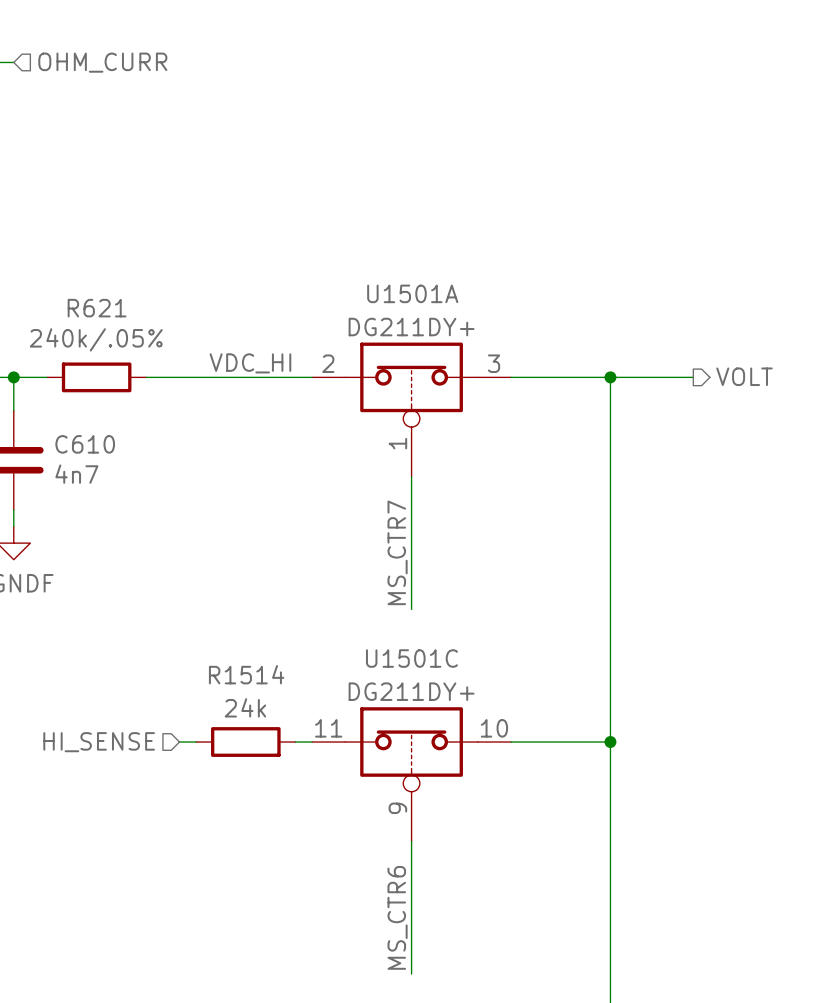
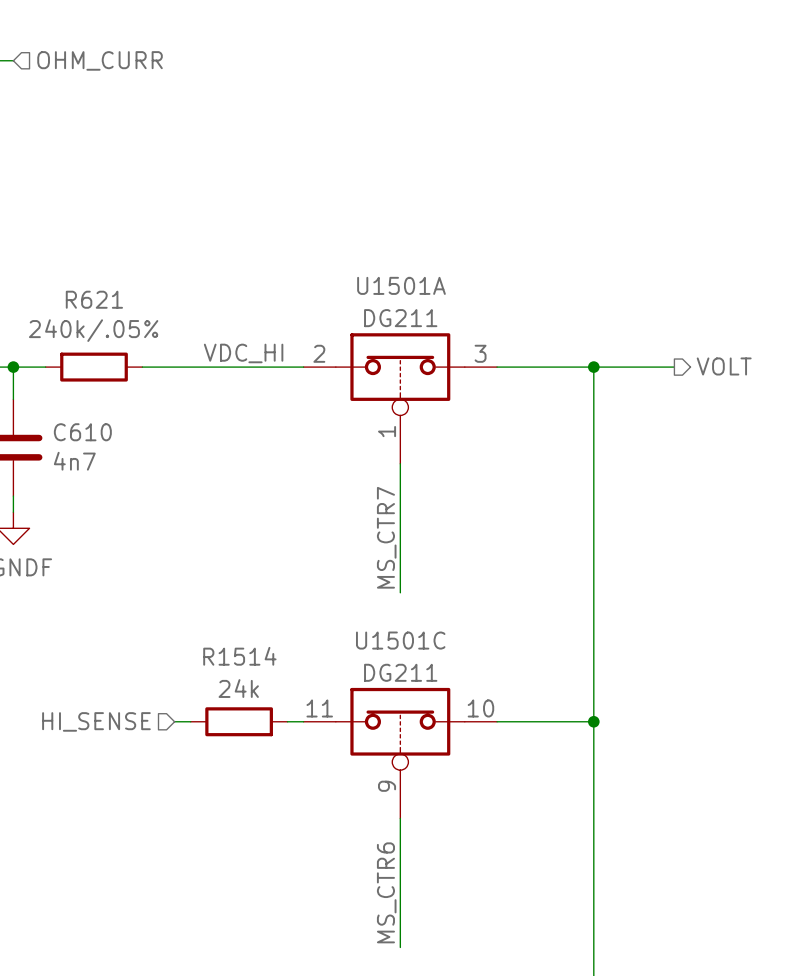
U1501A value: DG211DY+ (411, 327) -> DG211 (400, 318)
U1501C value: DG211DY+ (411, 691) -> DG211 (400, 672)

